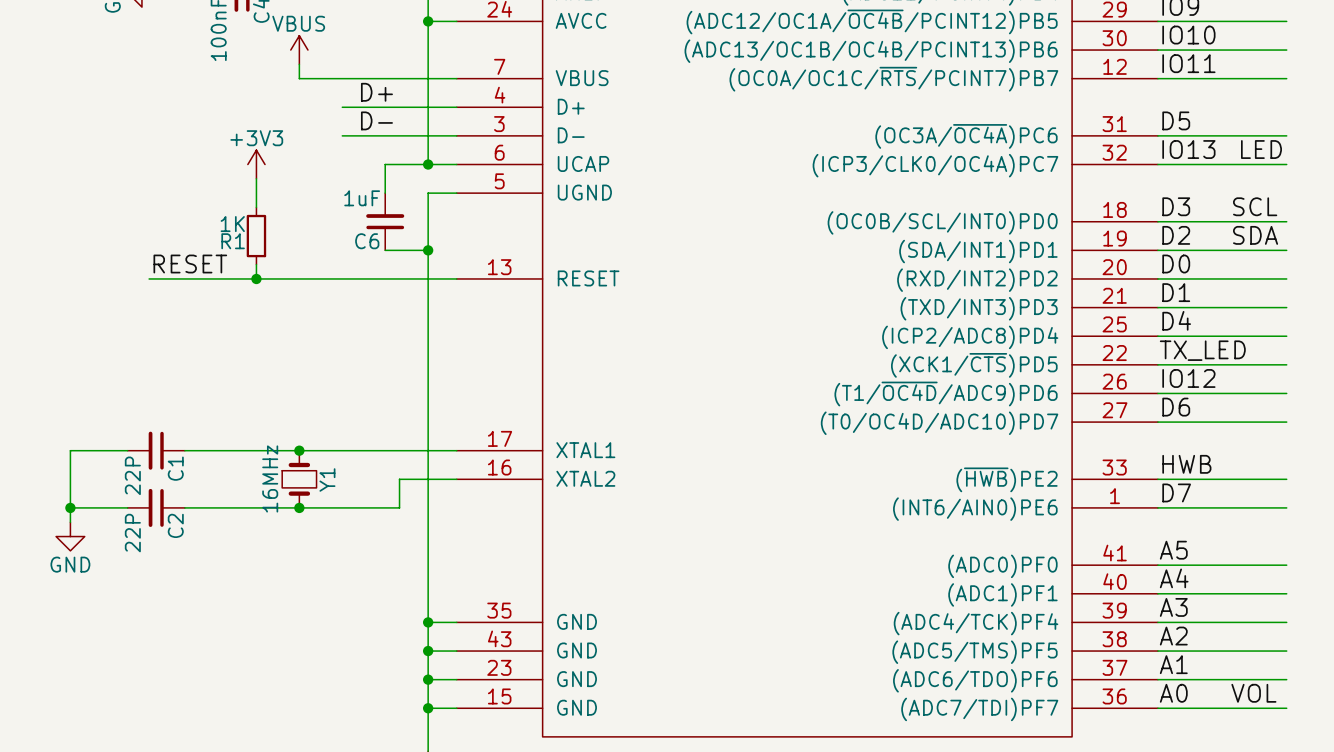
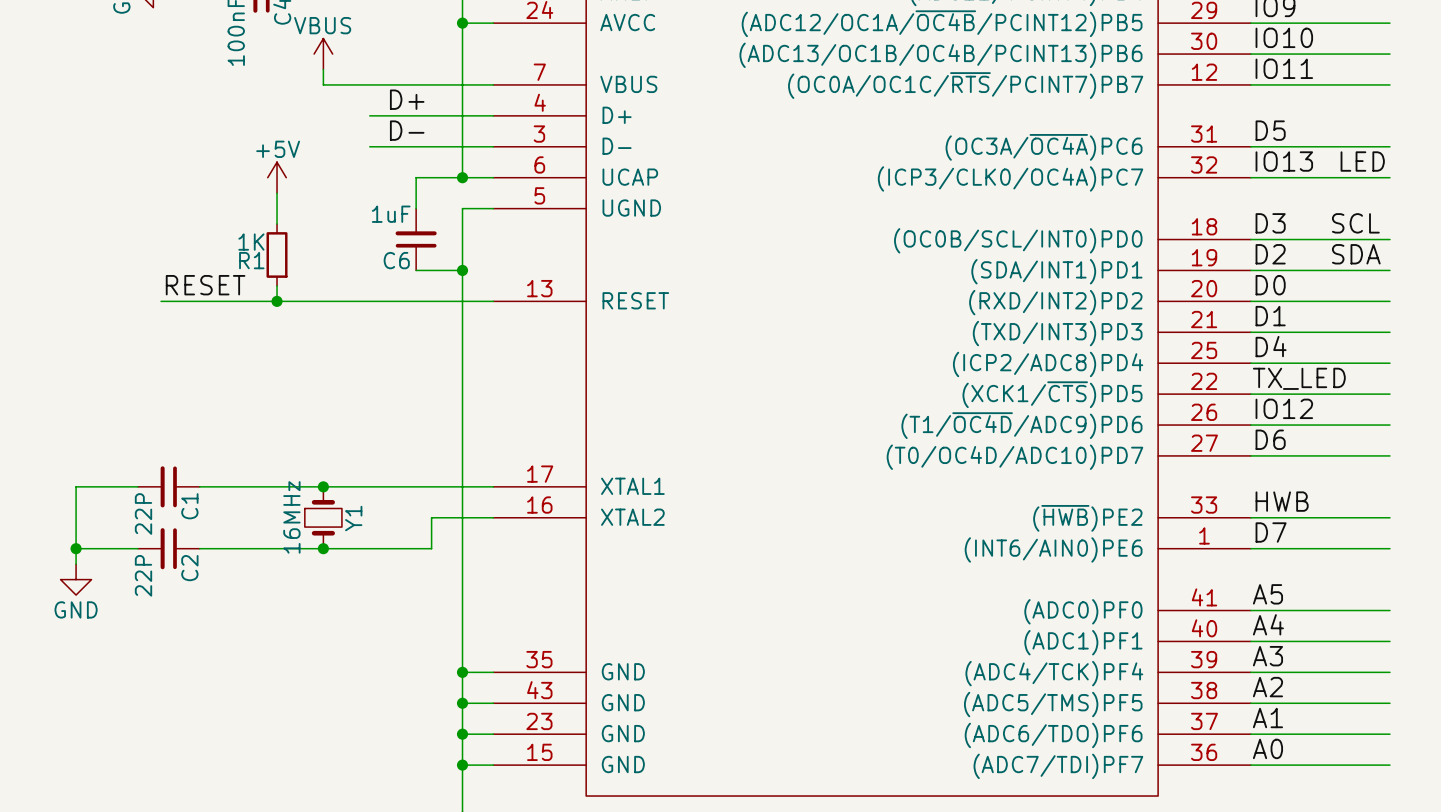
power symbol: +3V3 (256, 164) -> +5V (277, 177)
label: VOL (1253, 693) -> none

